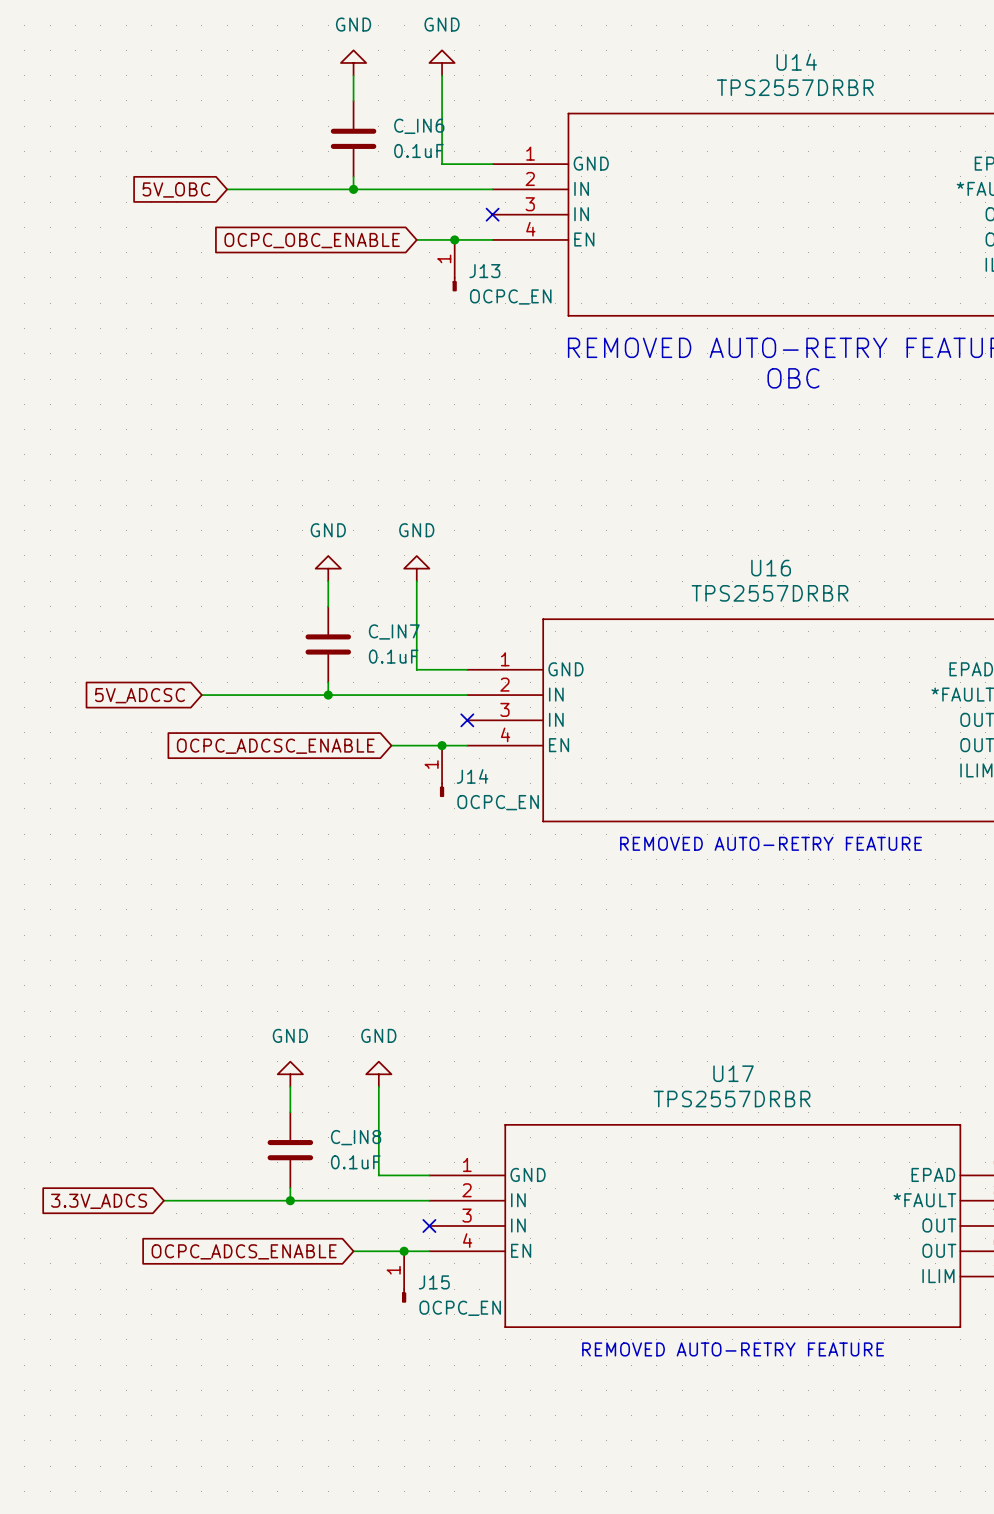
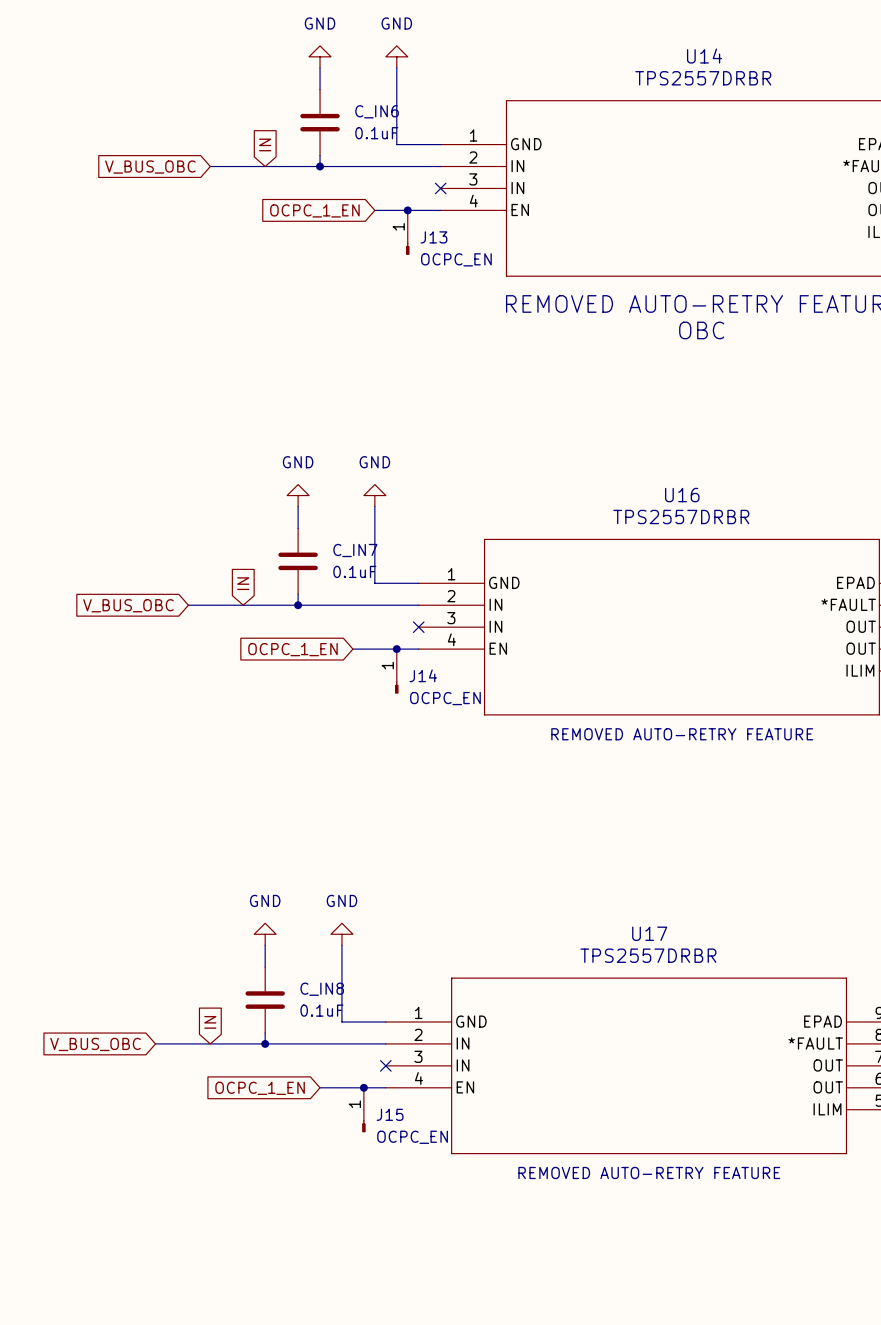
global label: none -> IN (265, 144)
global label: 5V_OBC (176, 189) -> V_BUS_OBC (150, 167)
global label: OCPC_OBC_ENABLE (312, 240) -> OCPC_1_EN (314, 210)
global label: none -> IN (243, 583)
global label: 5V_ADCSC (139, 695) -> V_BUS_OBC (128, 605)
global label: OCPC_ADCSC_ENABLE (275, 746) -> OCPC_1_EN (292, 649)
global label: none -> IN (210, 1022)
global label: 3.3V_ADCS (99, 1201) -> V_BUS_OBC (95, 1044)
global label: OCPC_ADCS_ENABLE (244, 1251) -> OCPC_1_EN (260, 1088)

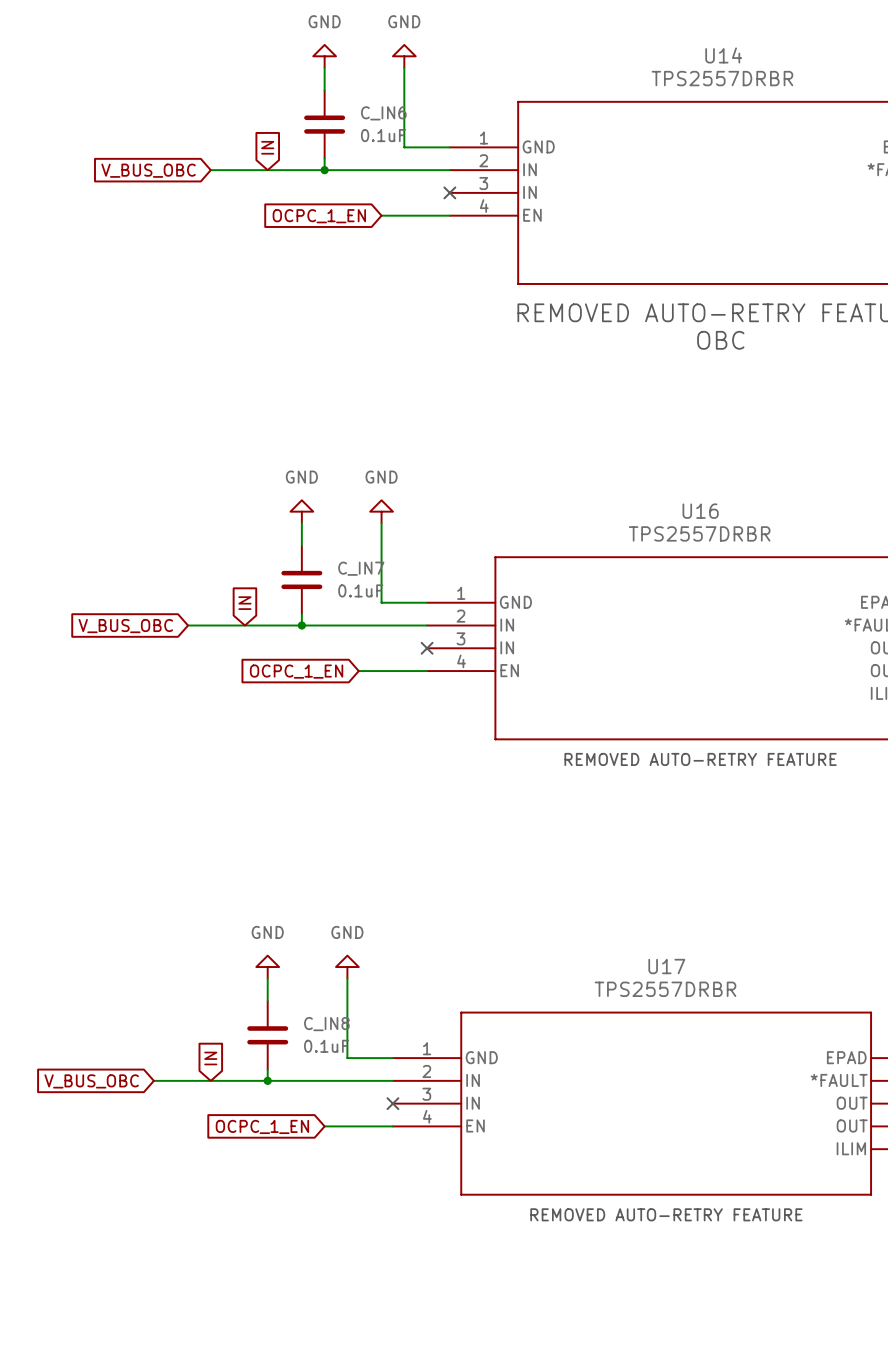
junction: (407, 210) -> none
J13: OCPC_EN (407, 232) -> none
junction: (396, 649) -> none
J14: OCPC_EN (396, 671) -> none
junction: (363, 1087) -> none
J15: OCPC_EN (363, 1110) -> none

